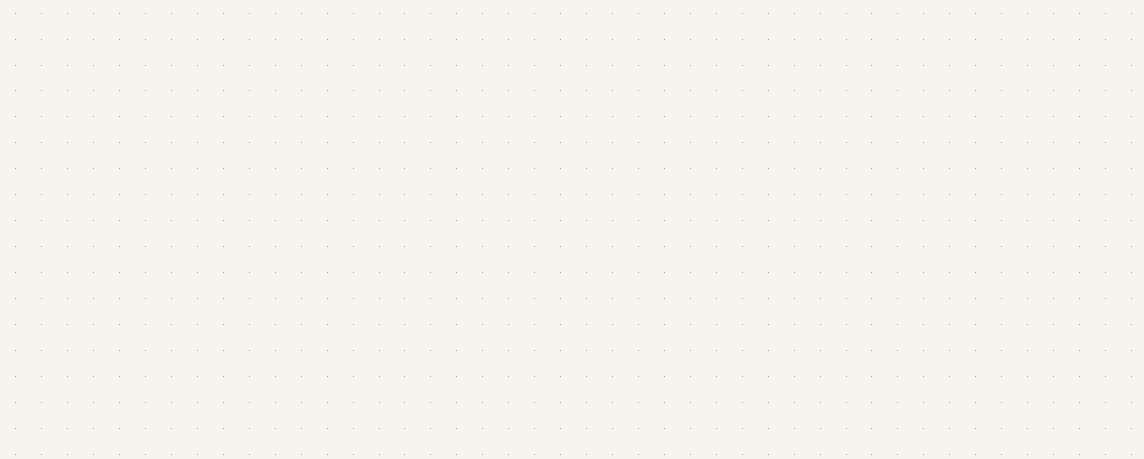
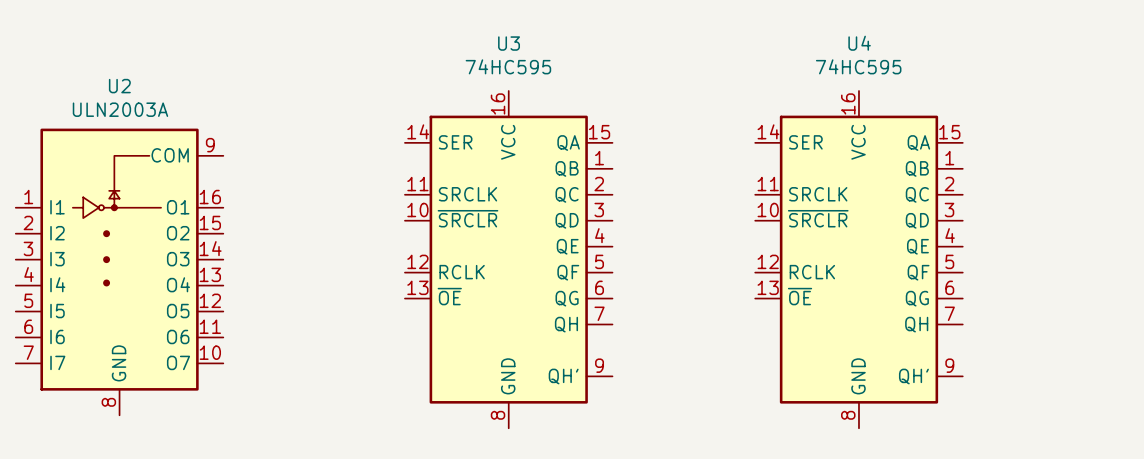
U3: none -> 74HC595 (508, 259)
U4: none -> 74HC595 (858, 259)
U2: none -> ULN2003A (119, 271)

